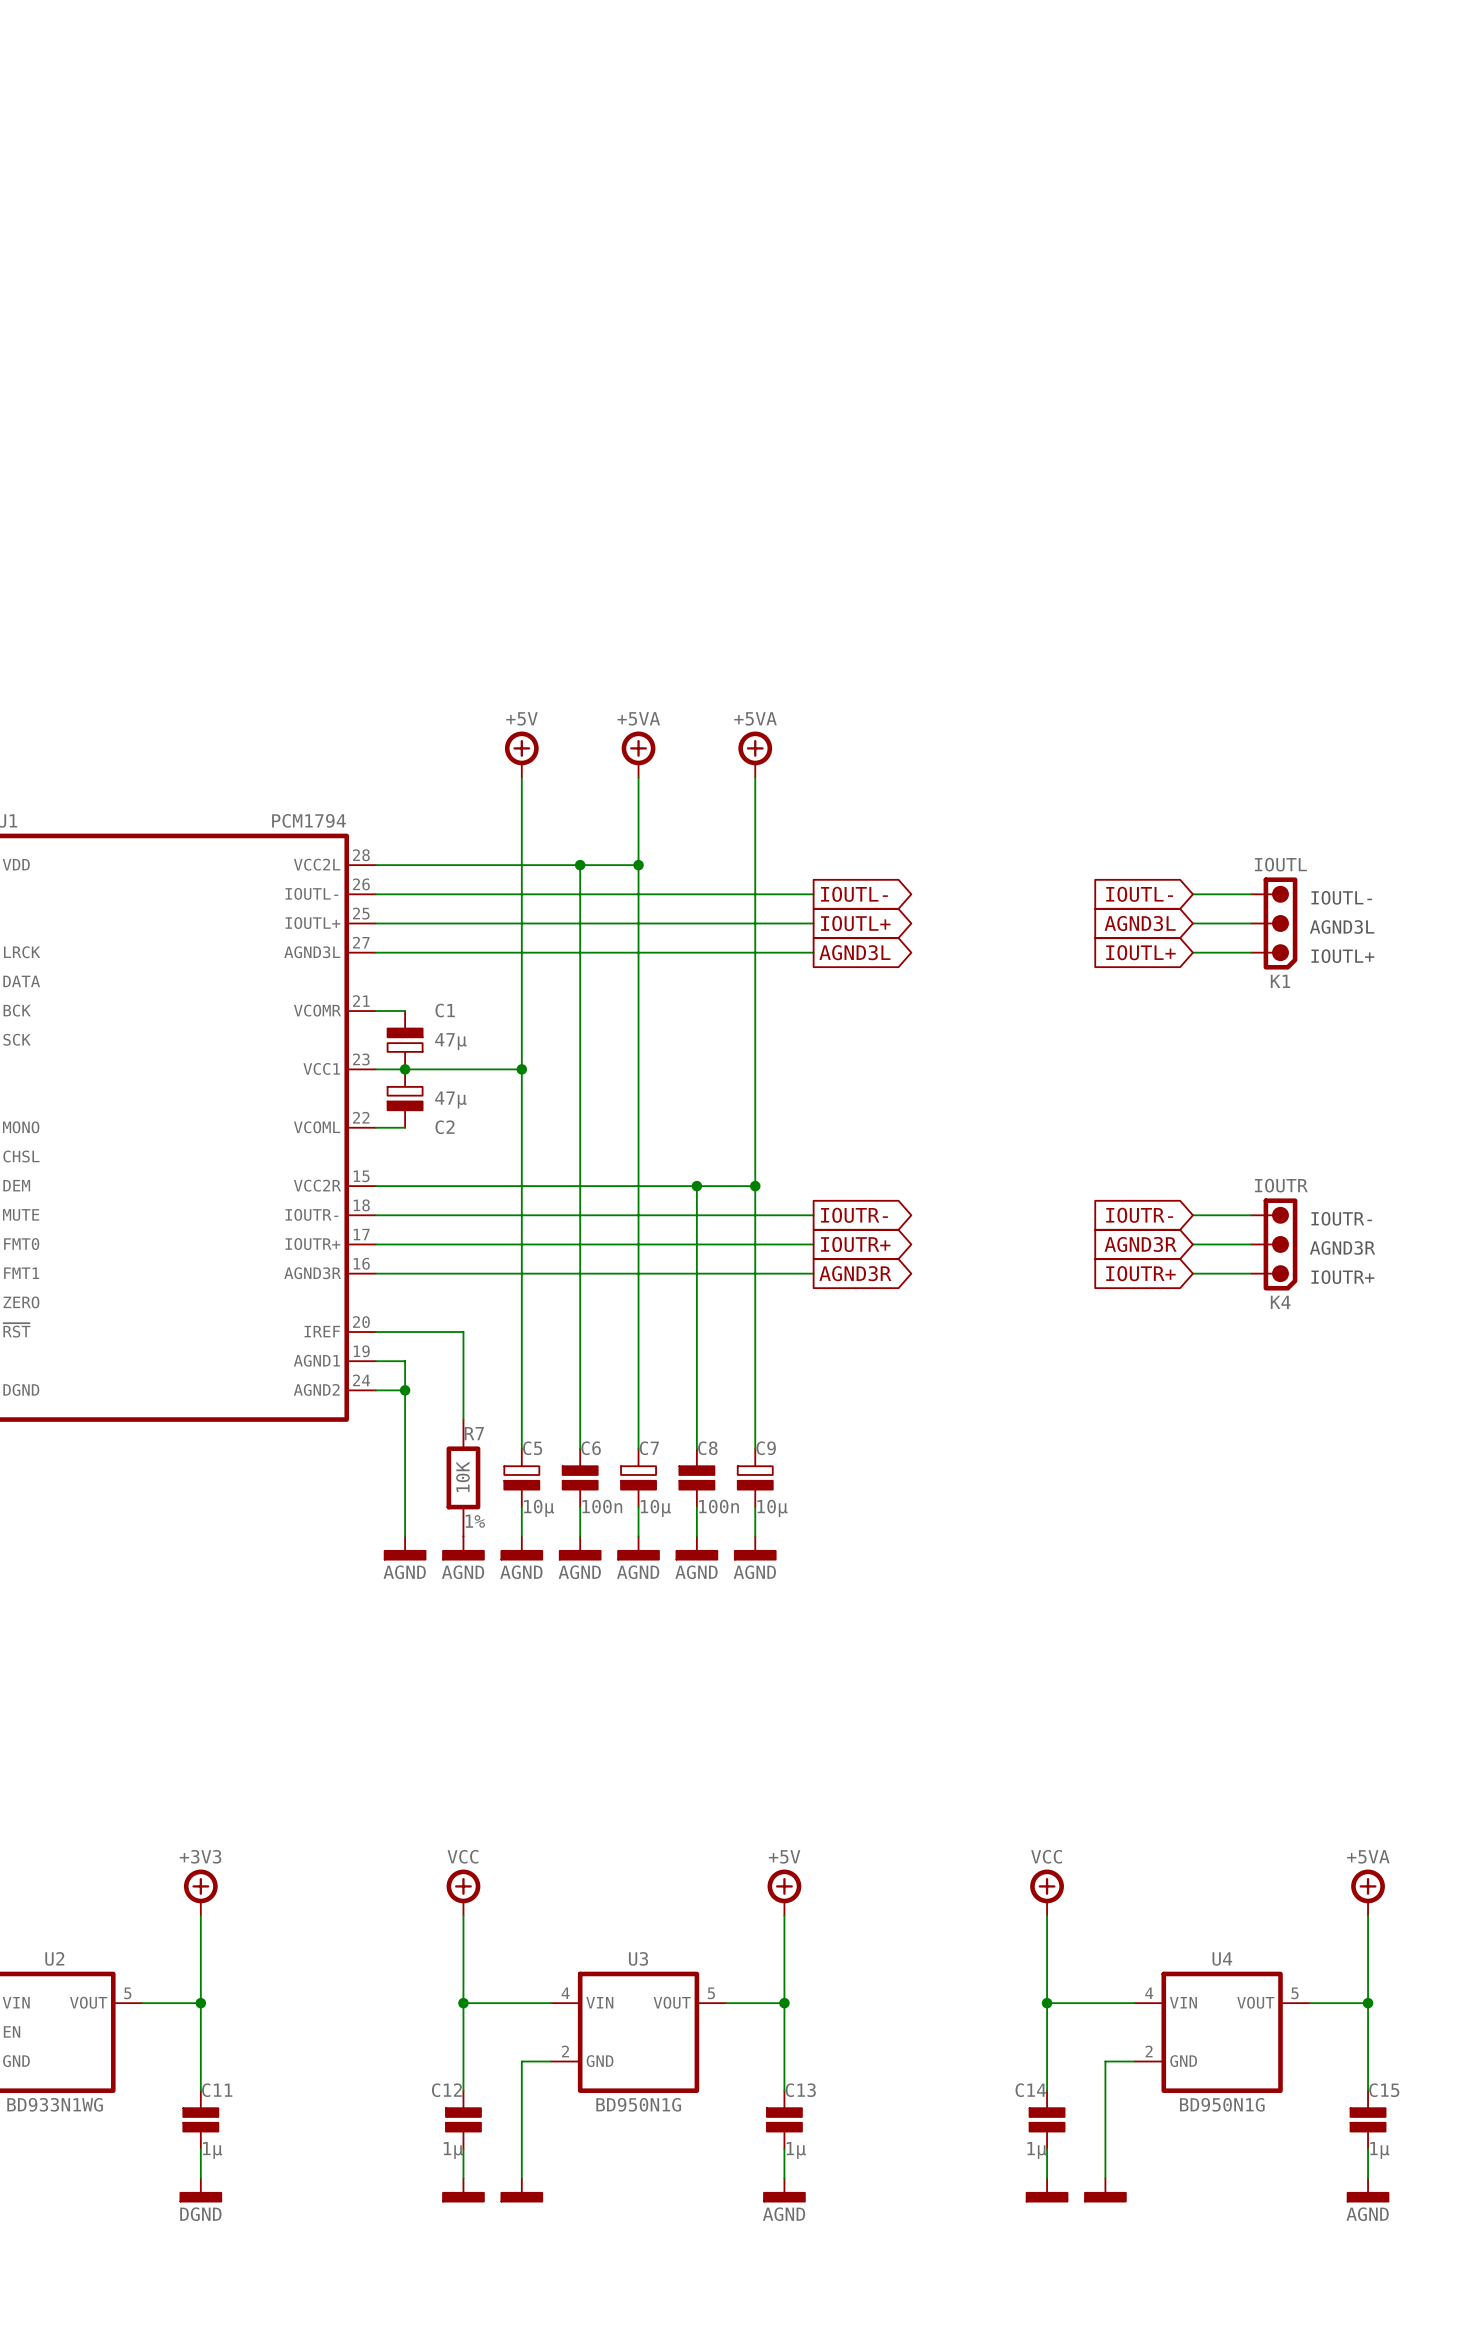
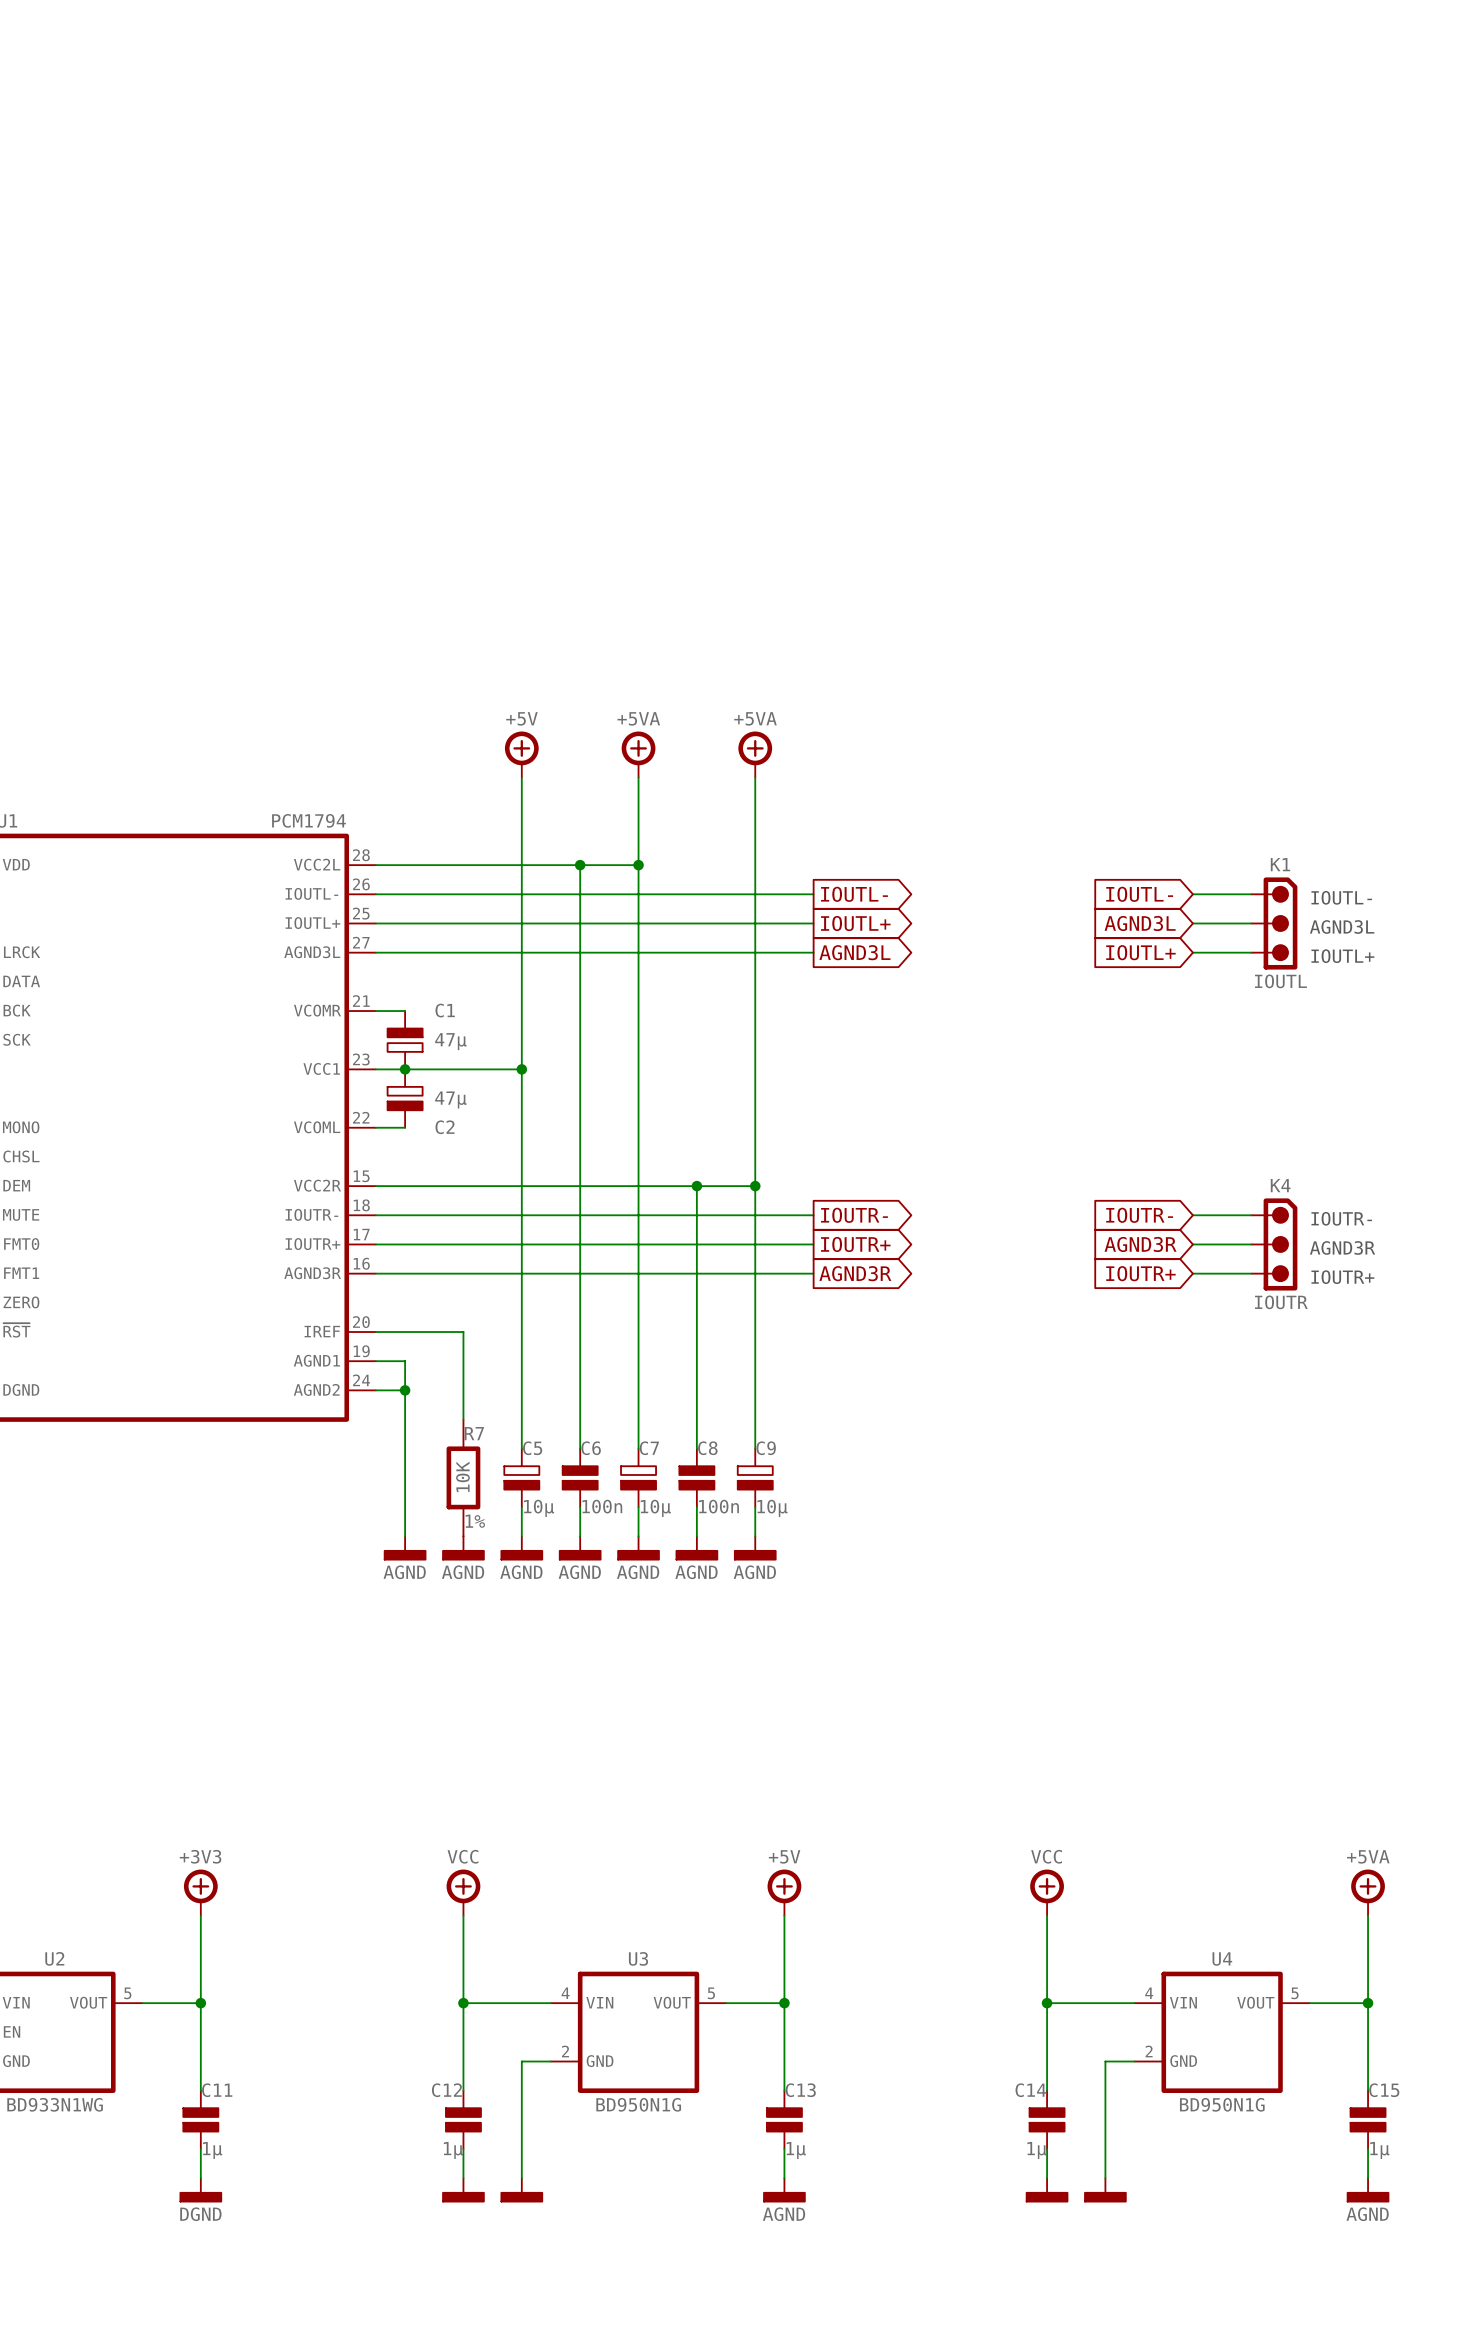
K1 flip: as is (1280, 923) -> up-down (1280, 923)
K4 flip: as is (1280, 1244) -> up-down (1280, 1244)

